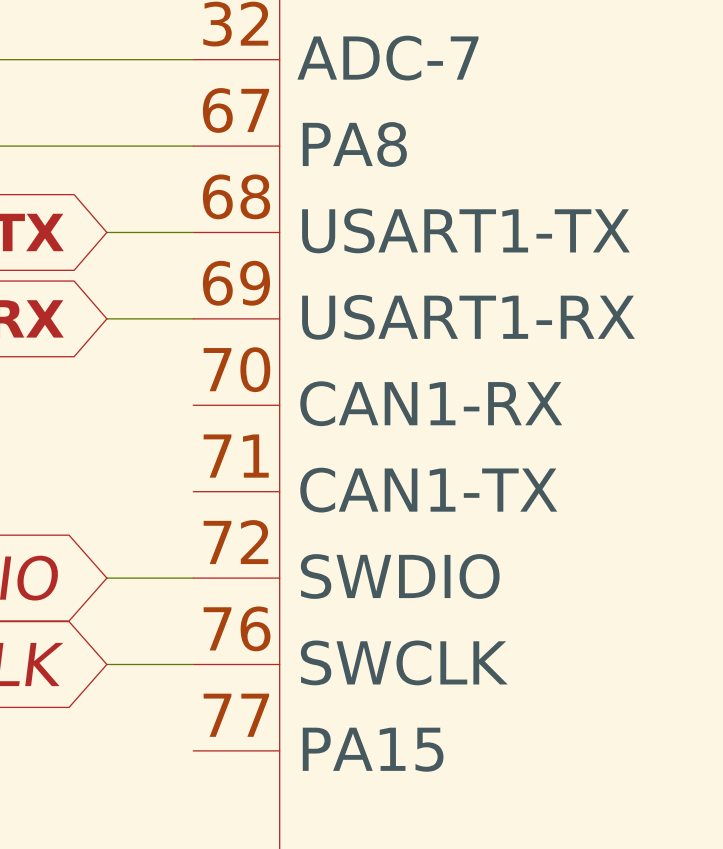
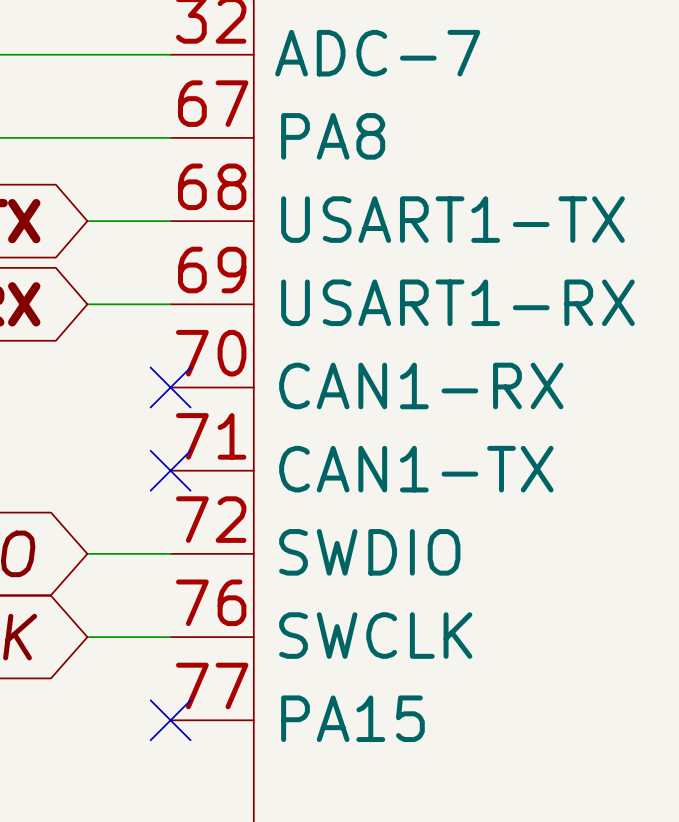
no-connect mark: none -> (170, 387)
no-connect mark: none -> (170, 470)
no-connect mark: none -> (170, 720)

